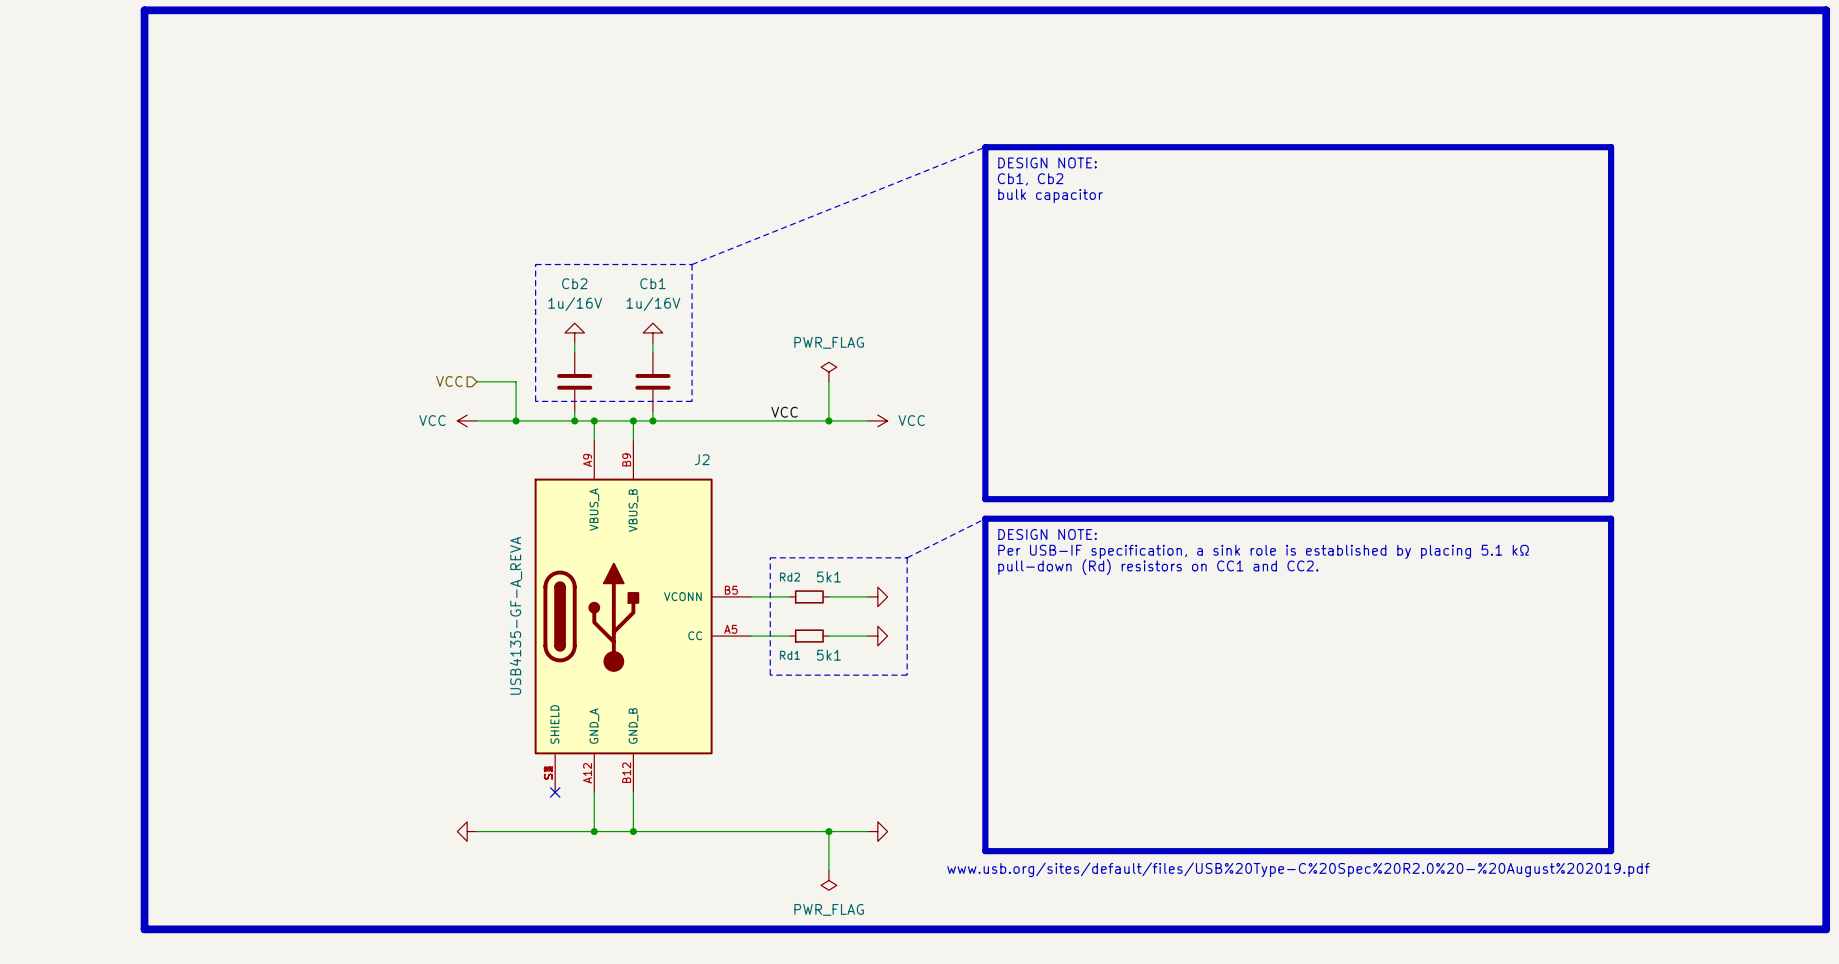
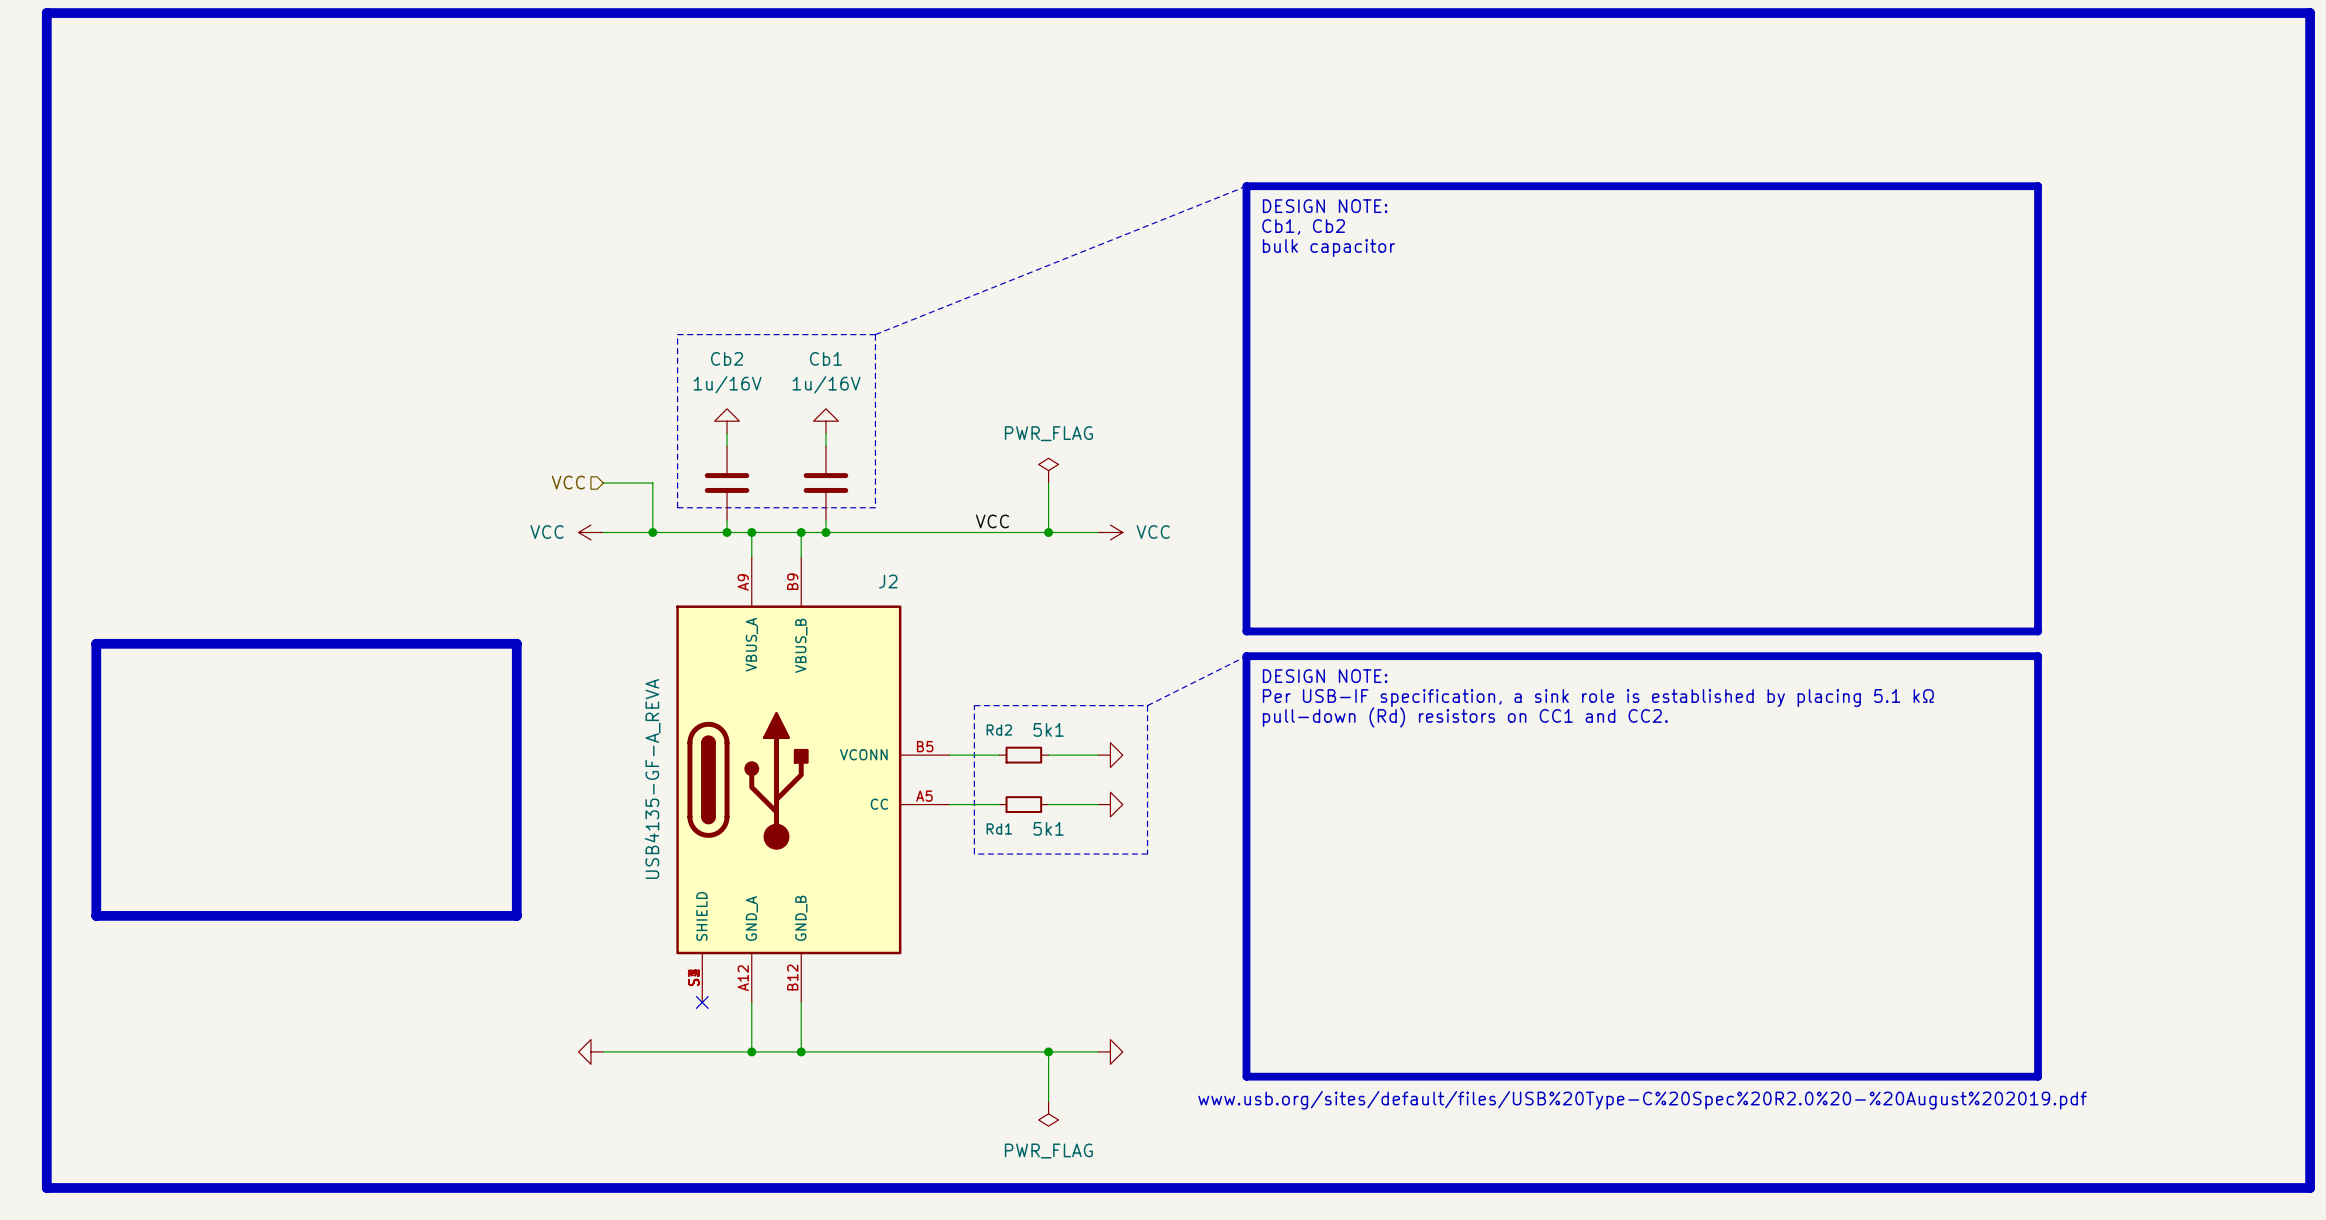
line: (144, 10) (144, 929) (1826, 929) -> (182, 13) (46, 13) (46, 1187) (2310, 1187) (2310, 1175)
line: none -> (96, 643) (516, 643) (516, 915) (96, 915) (96, 643)

